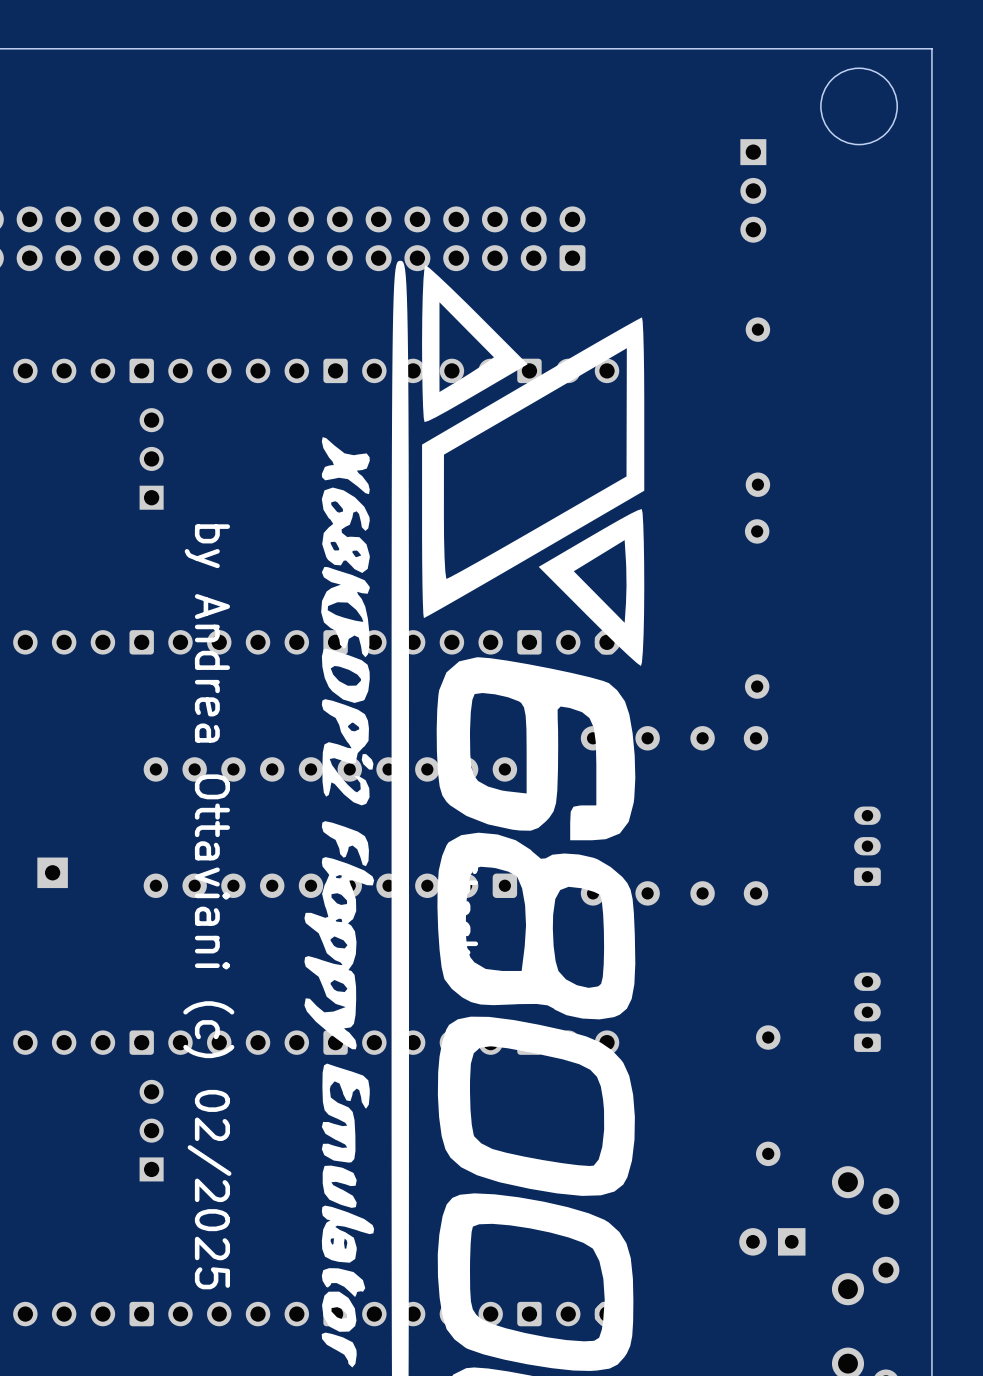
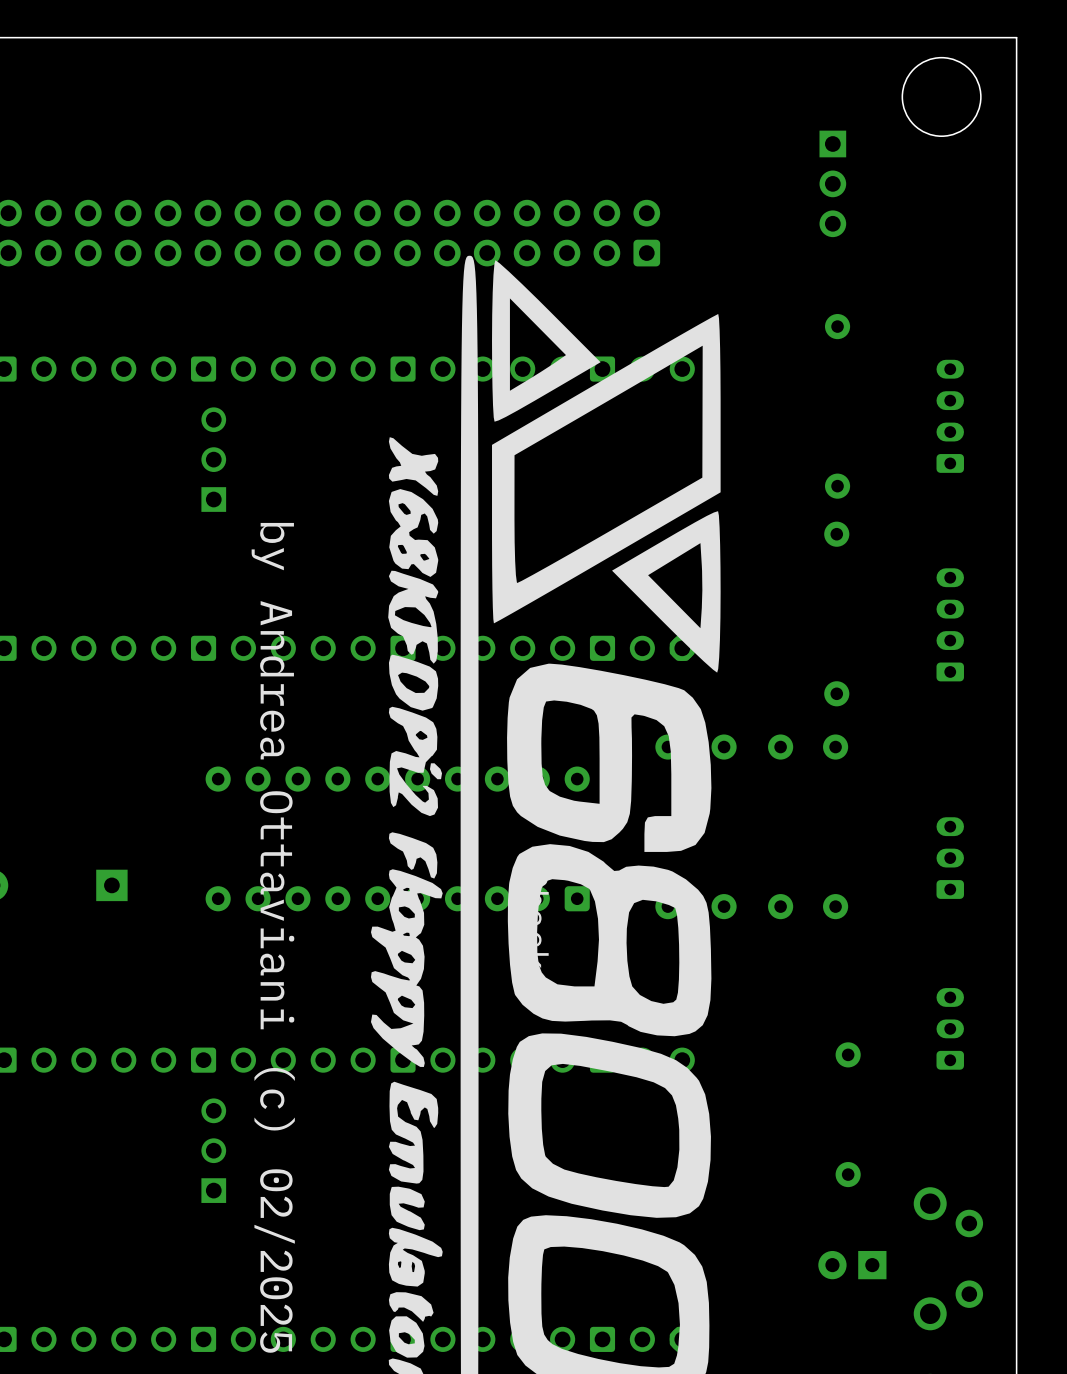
part: none -> (950, 416)
part: none -> (950, 624)

